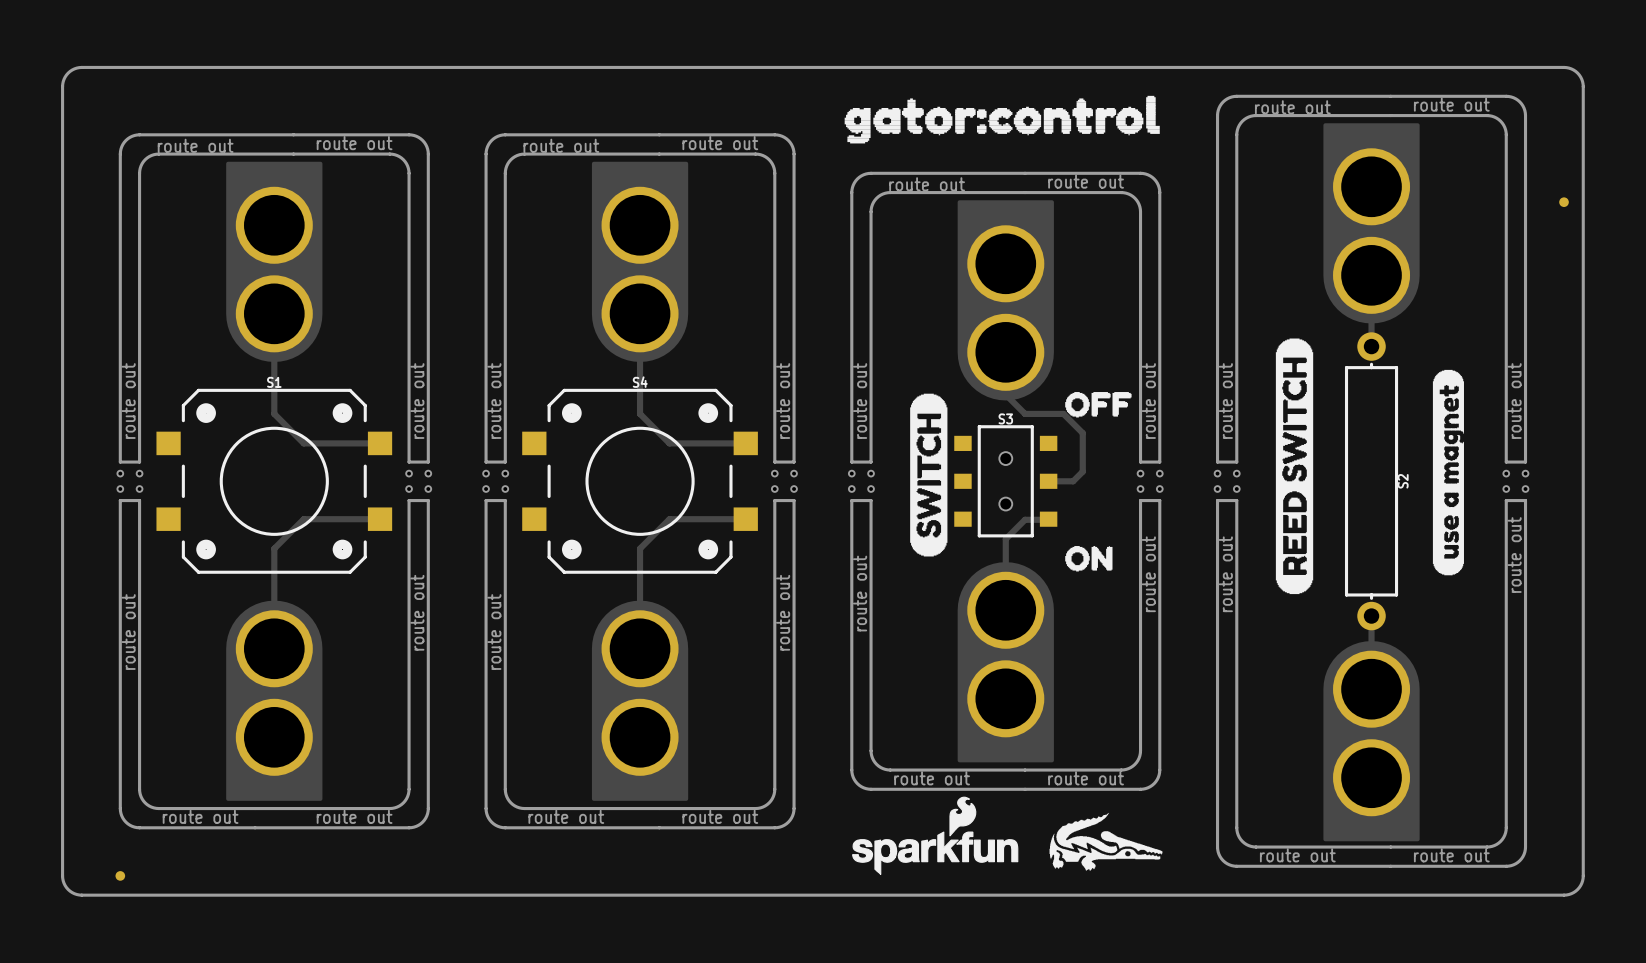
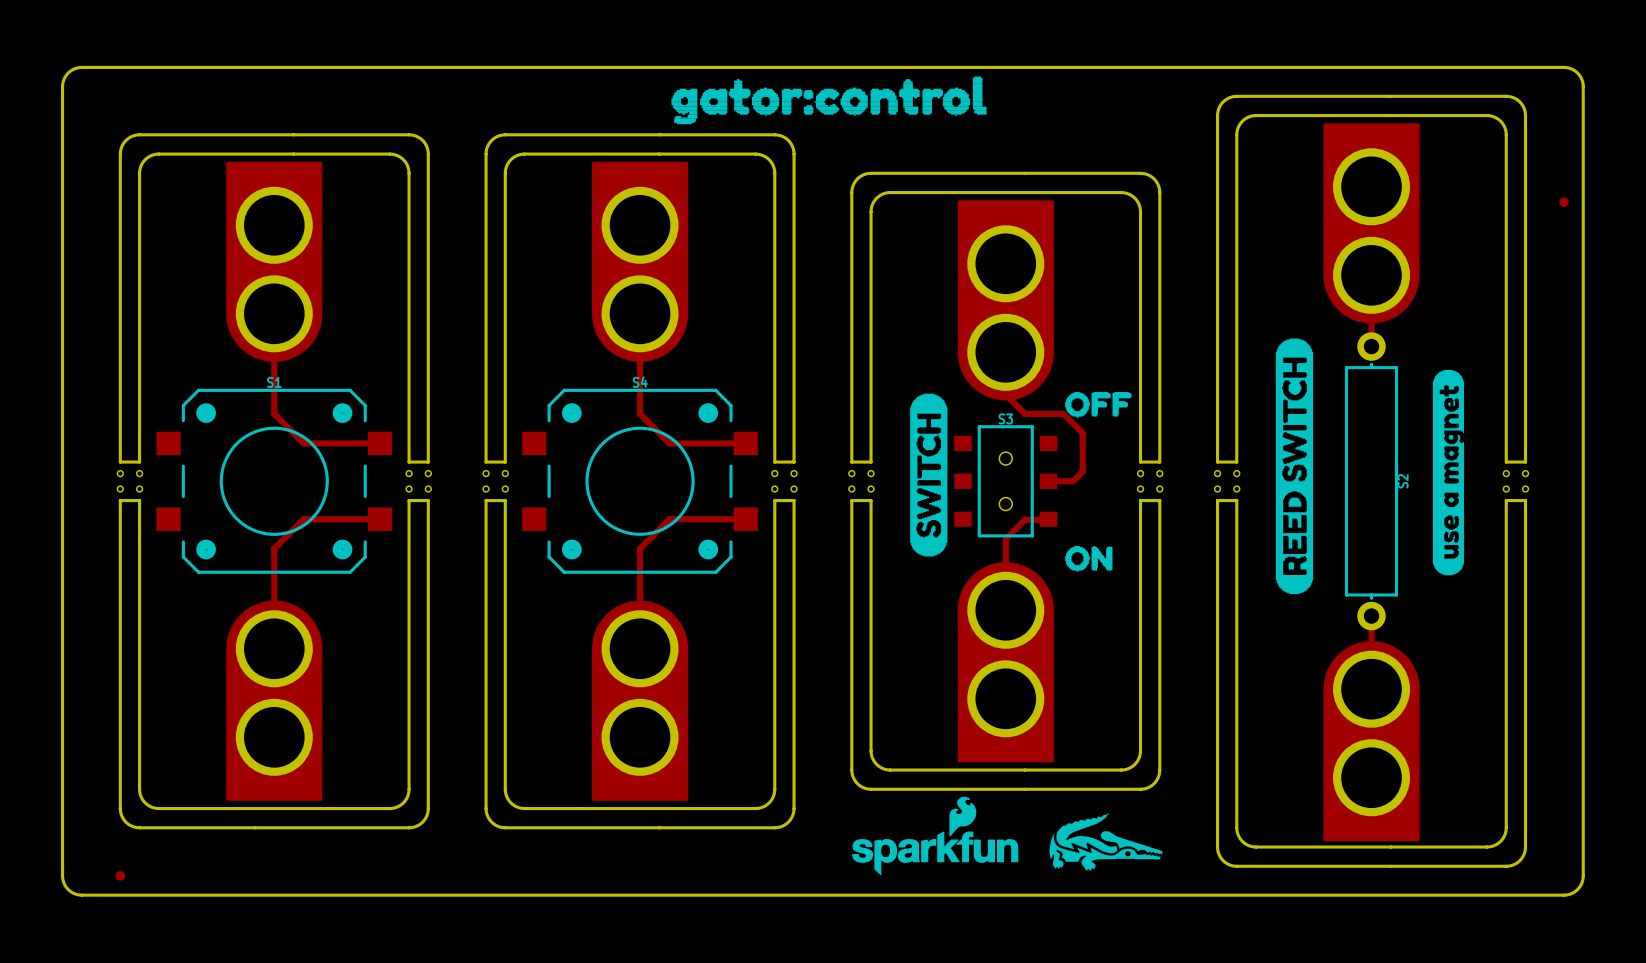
text: route out (1451, 104) -> none
text: route out (1292, 107) -> none
drawing position: (1002, 119) -> (828, 100)
text: route out (354, 143) -> none
text: route out (720, 143) -> none
text: route out (195, 145) -> none
text: route out (561, 145) -> none
text: route out (1086, 181) -> none
text: route out (927, 184) -> none
text: route out (128, 401) -> none
text: route out (417, 401) -> none
text: route out (494, 401) -> none
text: route out (783, 401) -> none
text: route out (860, 401) -> none
text: route out (1148, 401) -> none
text: route out (1225, 401) -> none
text: route out (1514, 401) -> none
text: route out (1514, 555) -> none
text: route out (1148, 574) -> none
text: route out (1225, 574) -> none
text: route out (860, 593) -> none
text: route out (417, 612) -> none
text: route out (783, 612) -> none
text: route out (128, 632) -> none
text: route out (494, 632) -> none
text: route out (932, 778) -> none
text: route out (1086, 778) -> none
text: route out (200, 816) -> none
text: route out (354, 816) -> none
text: route out (566, 816) -> none
text: route out (720, 816) -> none
text: route out (1297, 855) -> none
text: route out (1451, 855) -> none

